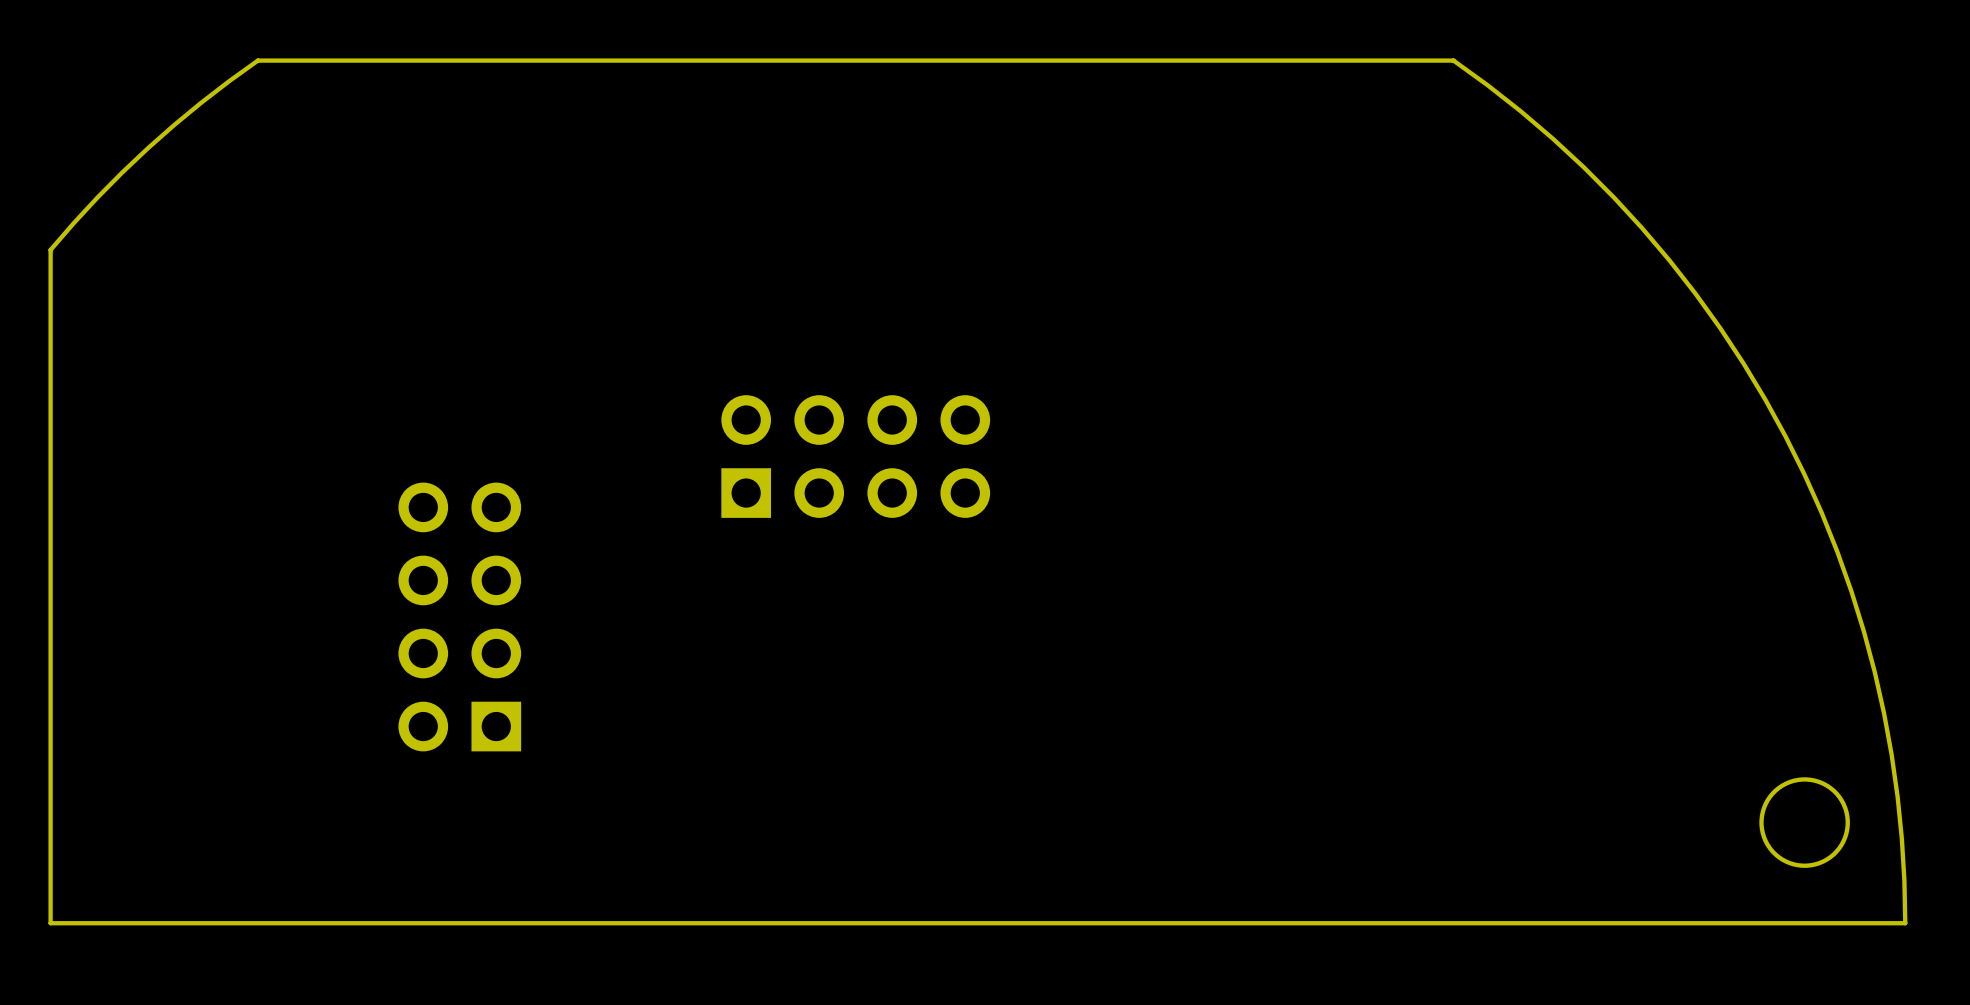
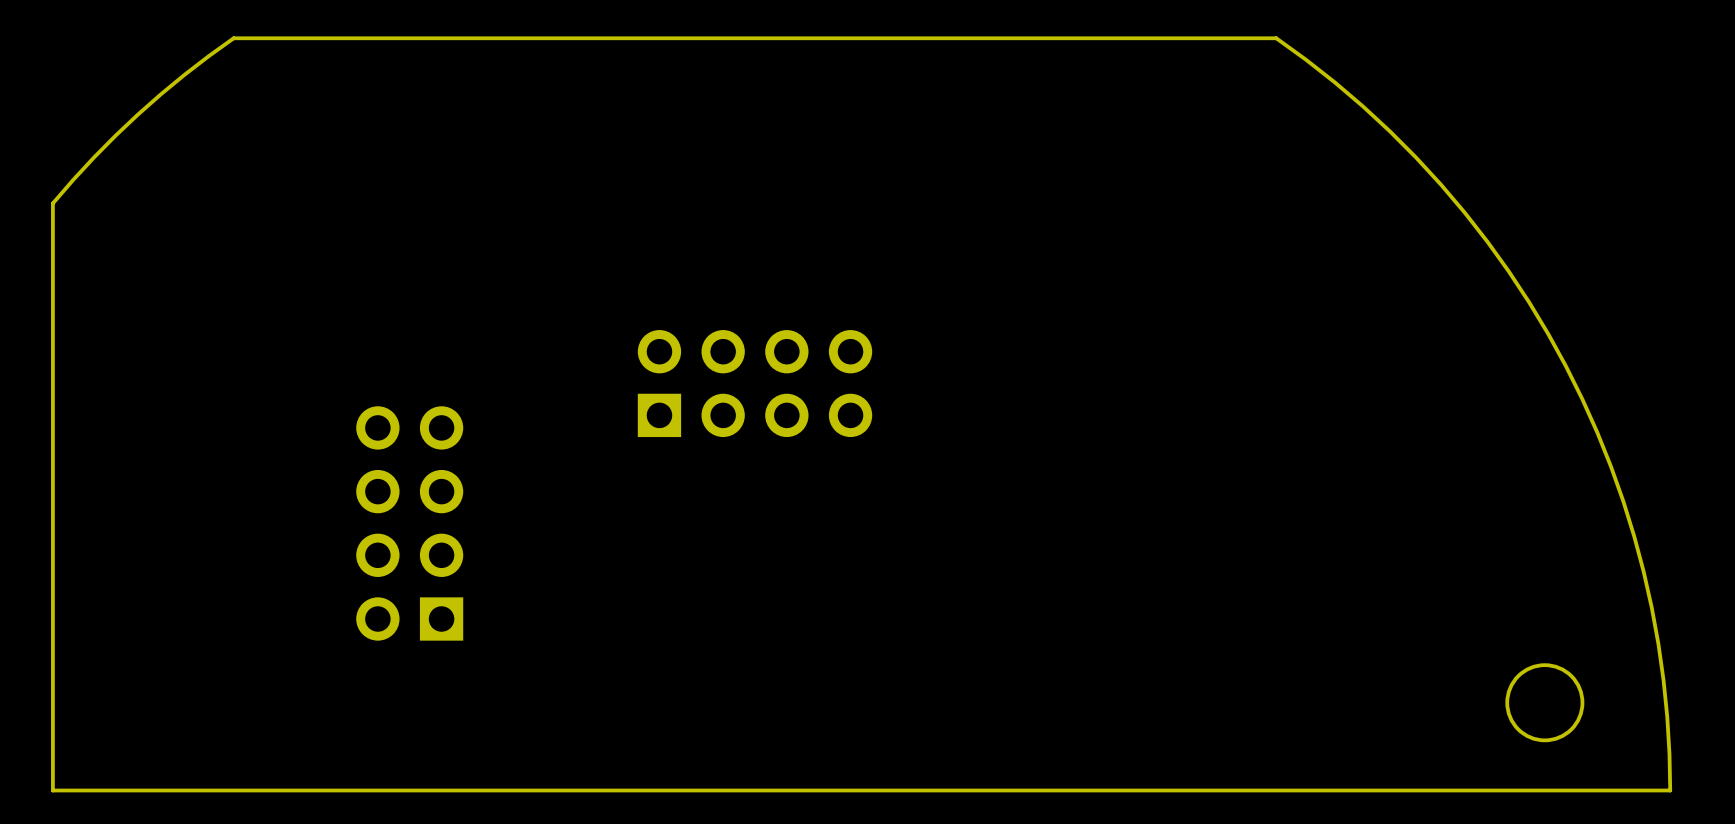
round board edge position: (1804, 822) -> (1544, 702)

